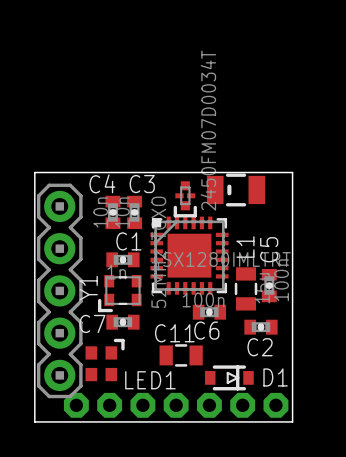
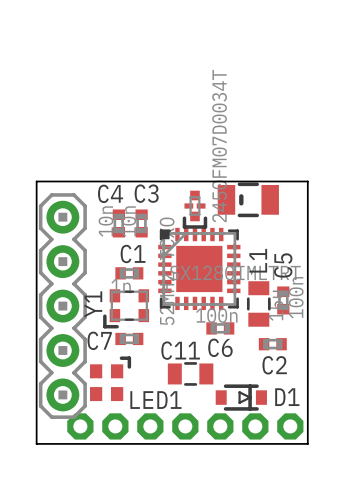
C4 footprint: [105, 195, 121, 230] -> [112, 209, 125, 238]
C3 footprint: [127, 195, 143, 230] -> [135, 209, 148, 238]
C1 footprint: [106, 252, 140, 268] -> [115, 267, 144, 280]
C5 footprint: [261, 268, 277, 303] -> [277, 286, 290, 315]
C6 footprint: [192, 304, 227, 320] -> [206, 322, 235, 335]
C7 footprint: [106, 314, 140, 330] -> [115, 332, 144, 346]
C2 footprint: [244, 319, 278, 335] -> [258, 338, 287, 351]

